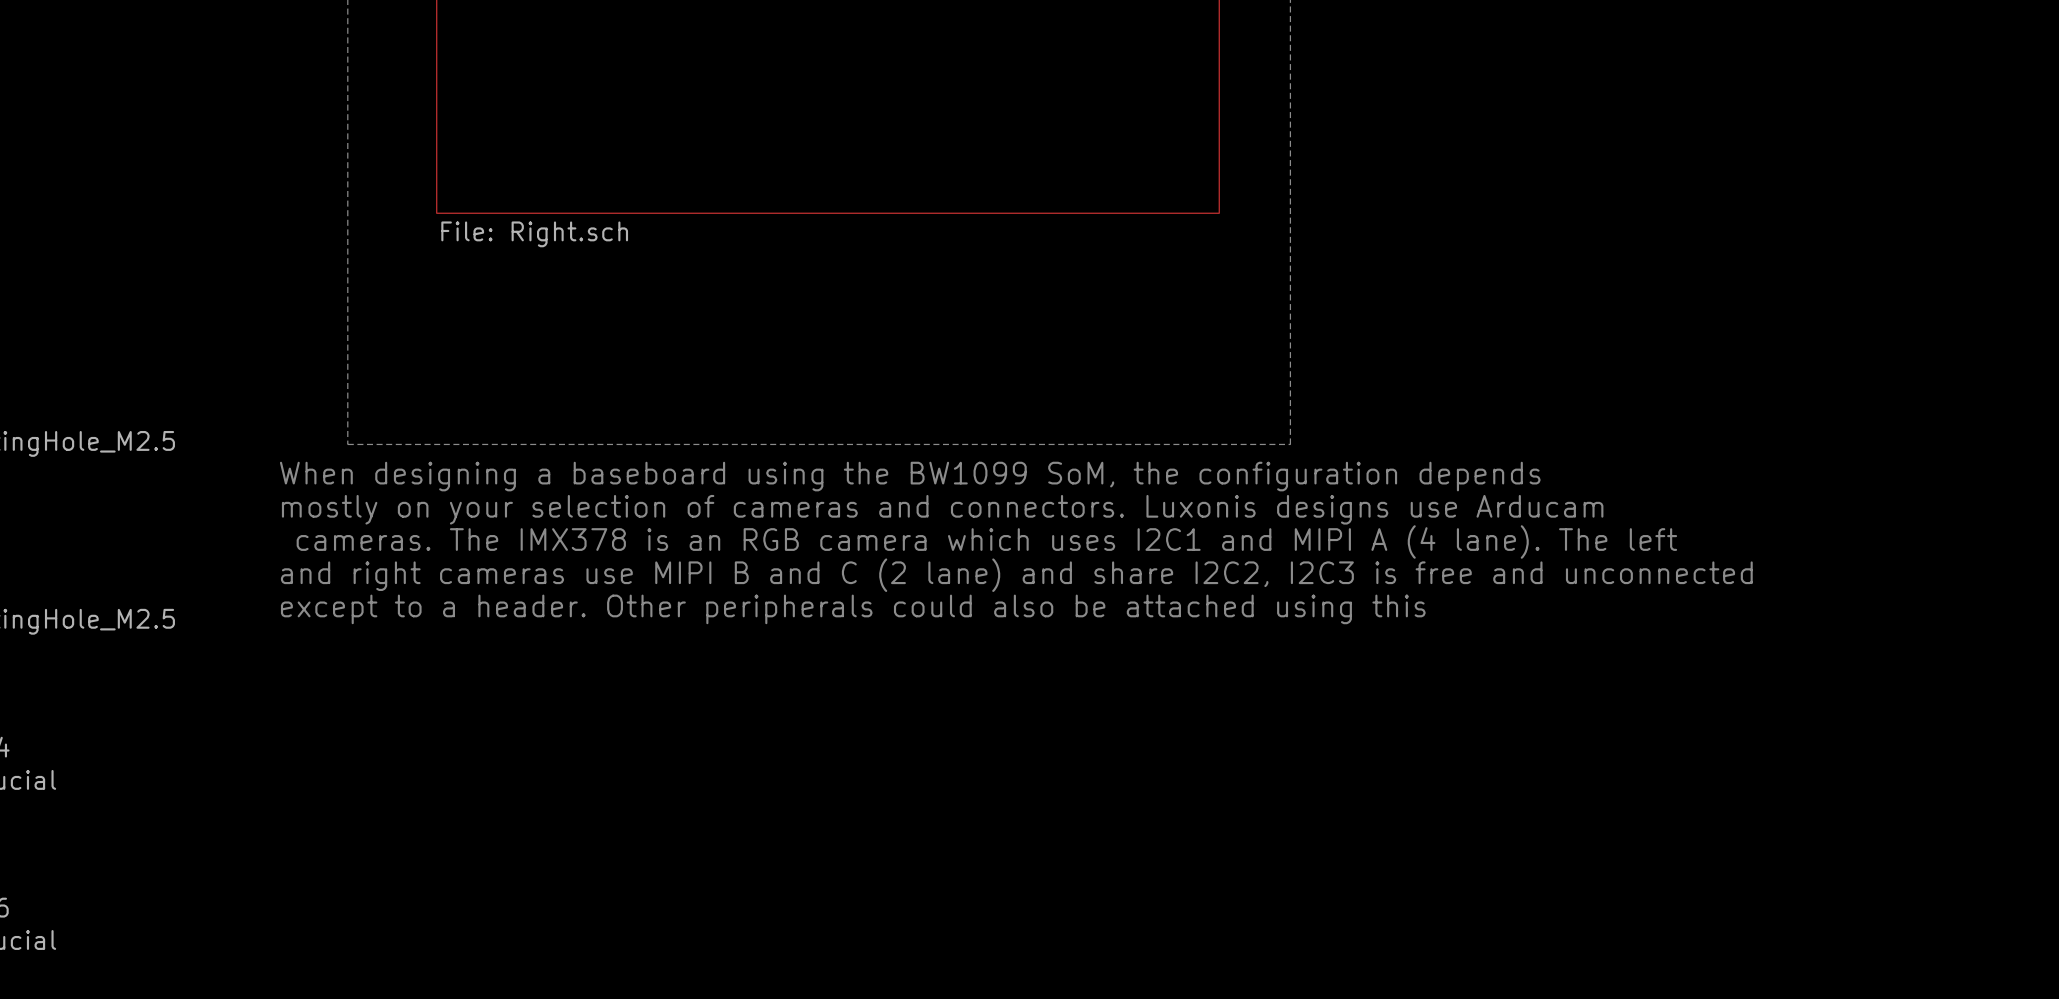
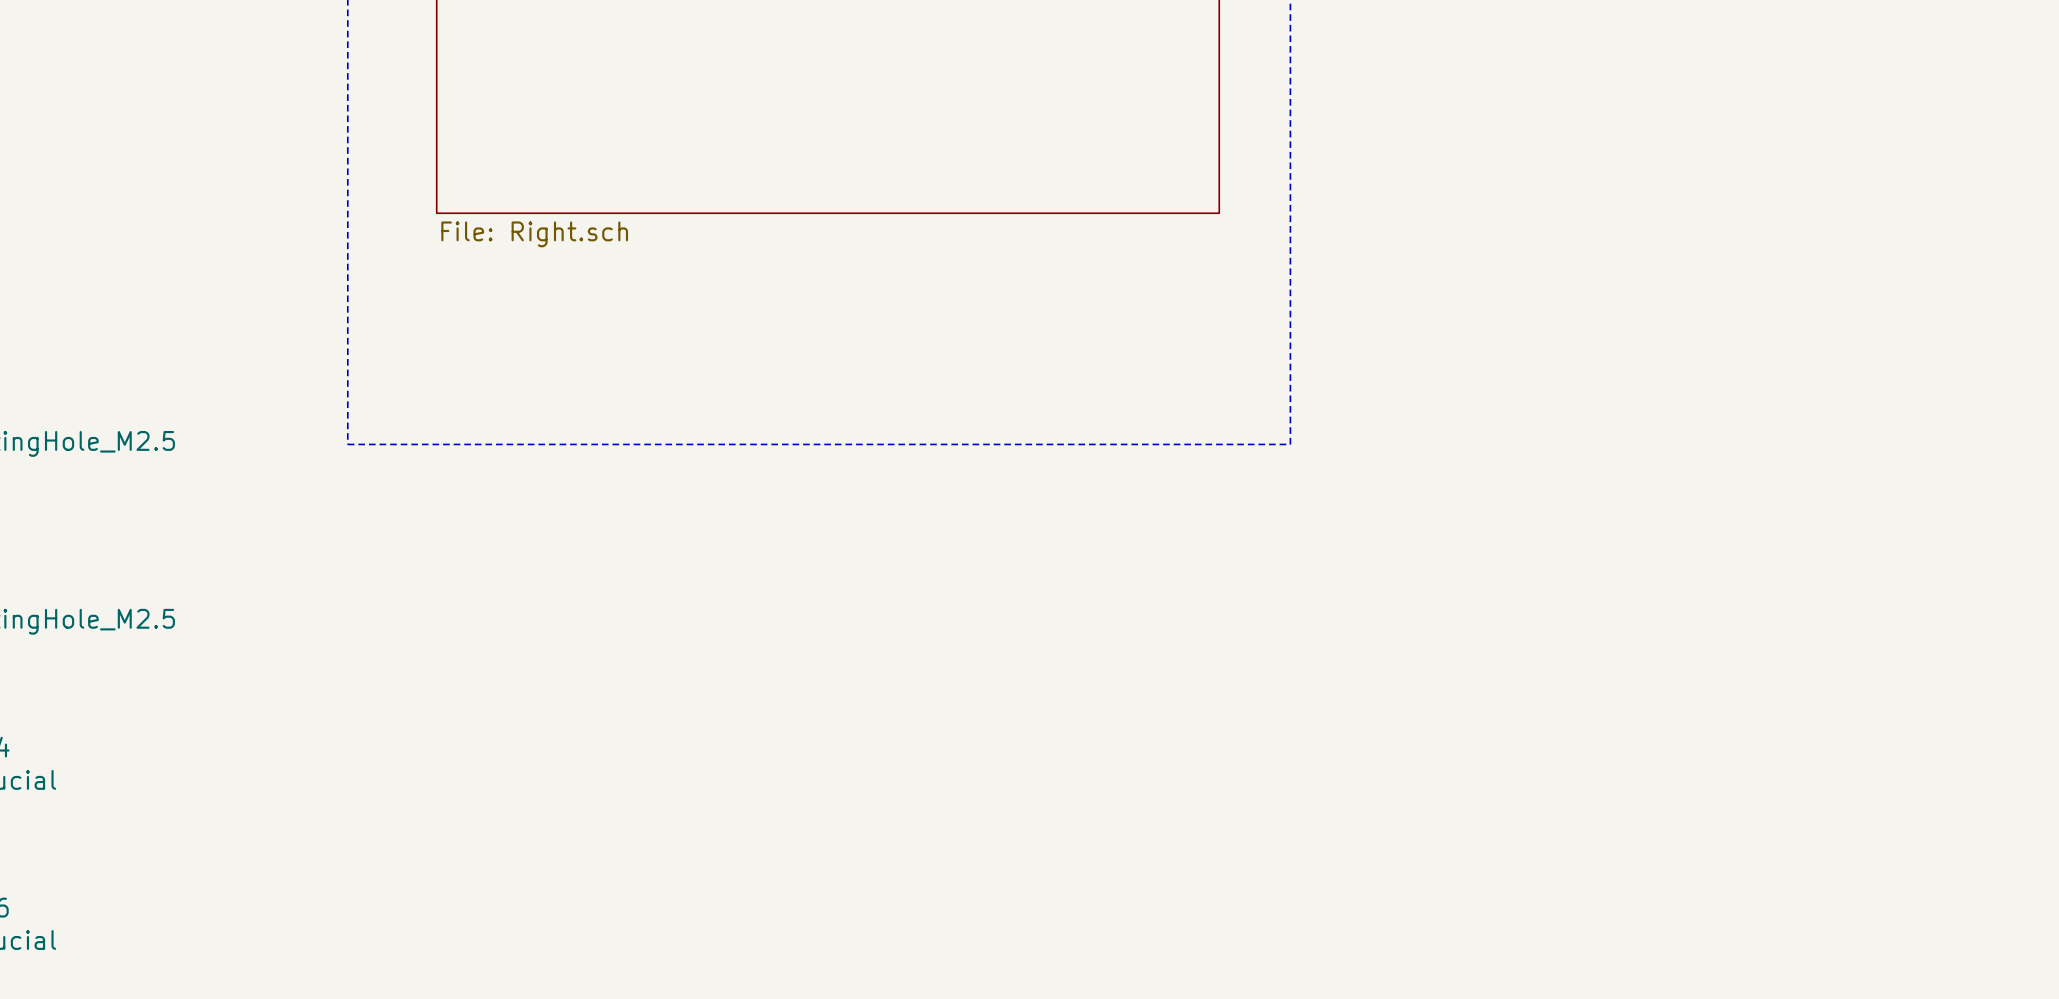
text: When designing a baseboard using the BW1099 SoM, the configuration depends (910, 476) -> none
text: mostly on your selection of cameras and connectors. Luxonis designs use Arducam (942, 509) -> none
text: cameras. The IMX378 is an RGB camera which uses I2C1 and MIPI A (4 lane). The left (986, 541) -> none
text: and right cameras use MIPI B and C (2 lane) and share I2C2, I2C3 is free and unconnected (1016, 575) -> none
text: except to a header. Other peripherals could also be attached using this (853, 609) -> none

